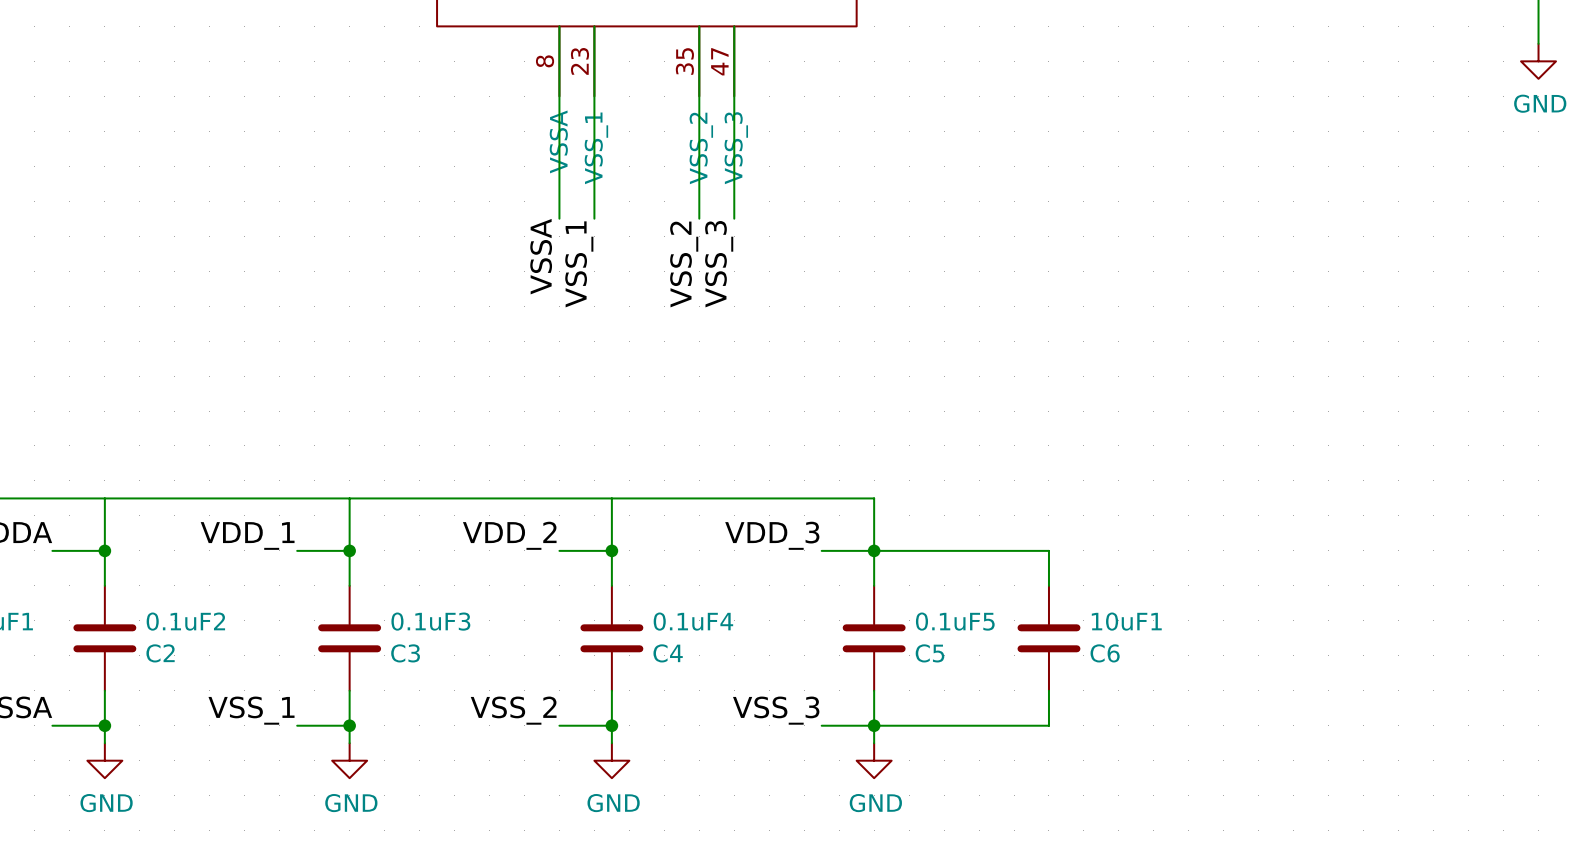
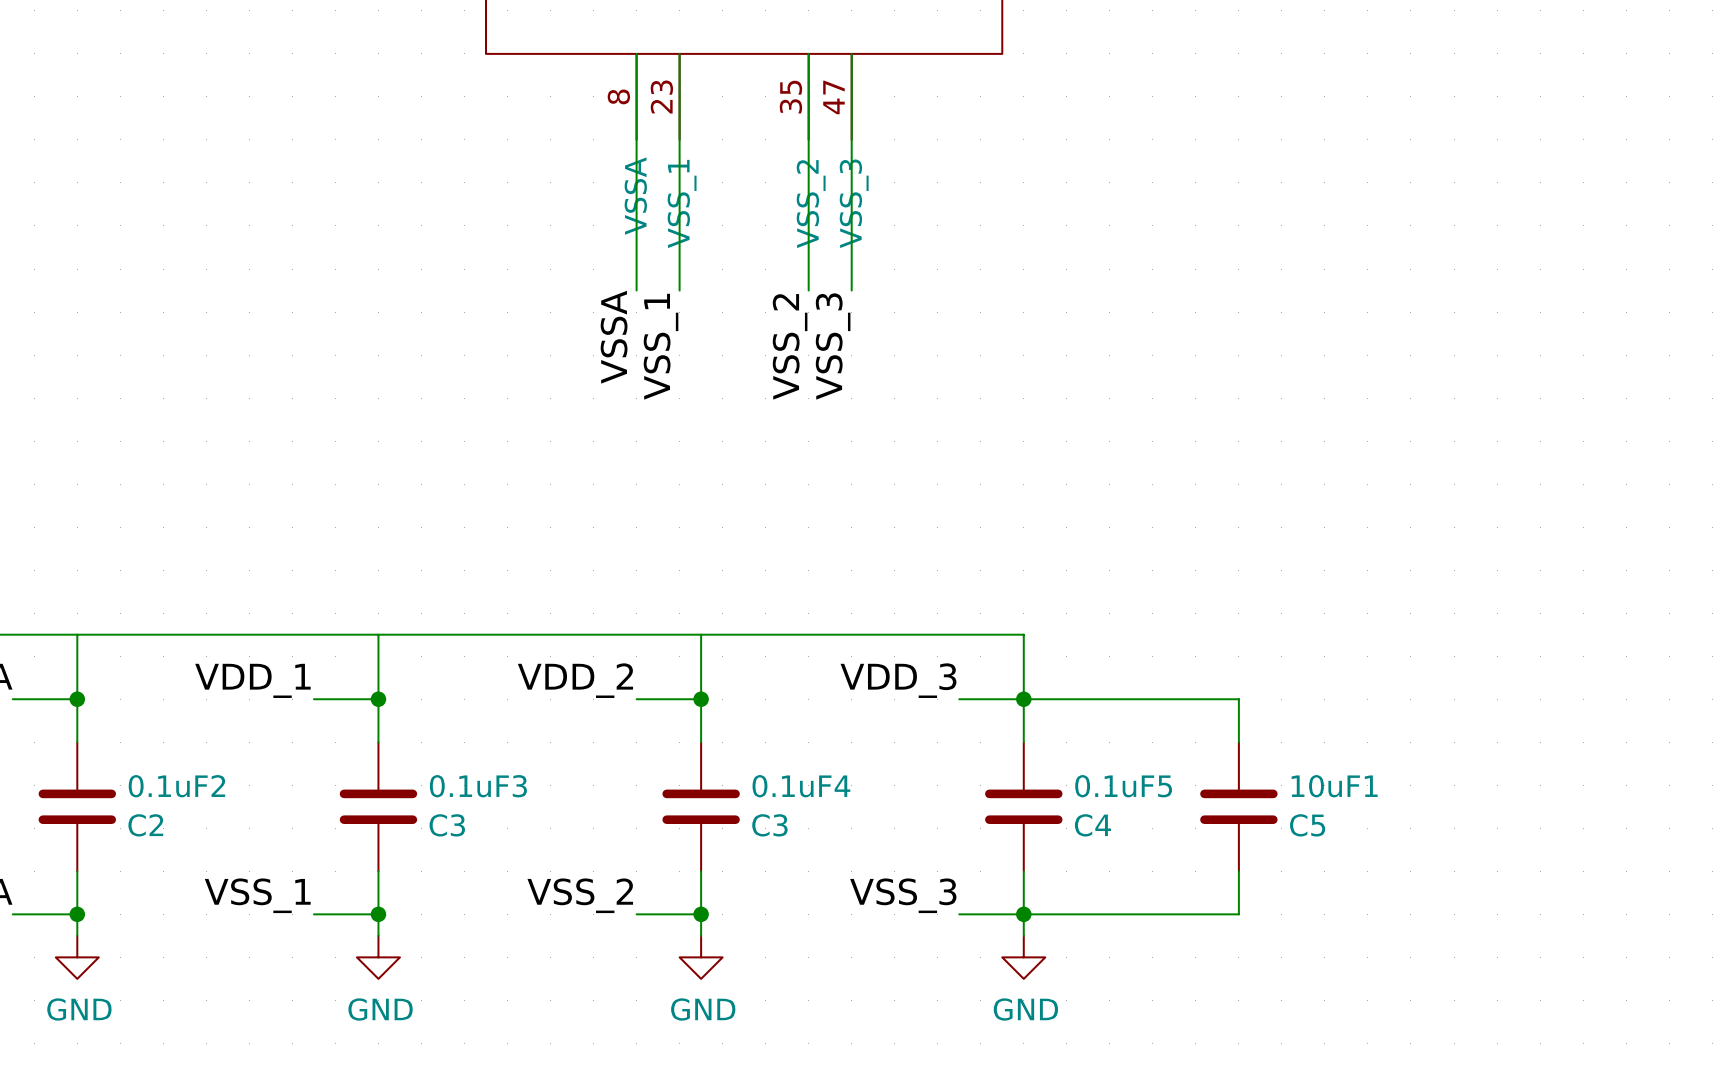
0.1uF4 value: C4 (668, 653) -> C3 (769, 825)
0.1uF5 value: C5 (929, 653) -> C4 (1092, 825)
10uF1 value: C6 (1105, 653) -> C5 (1307, 825)

